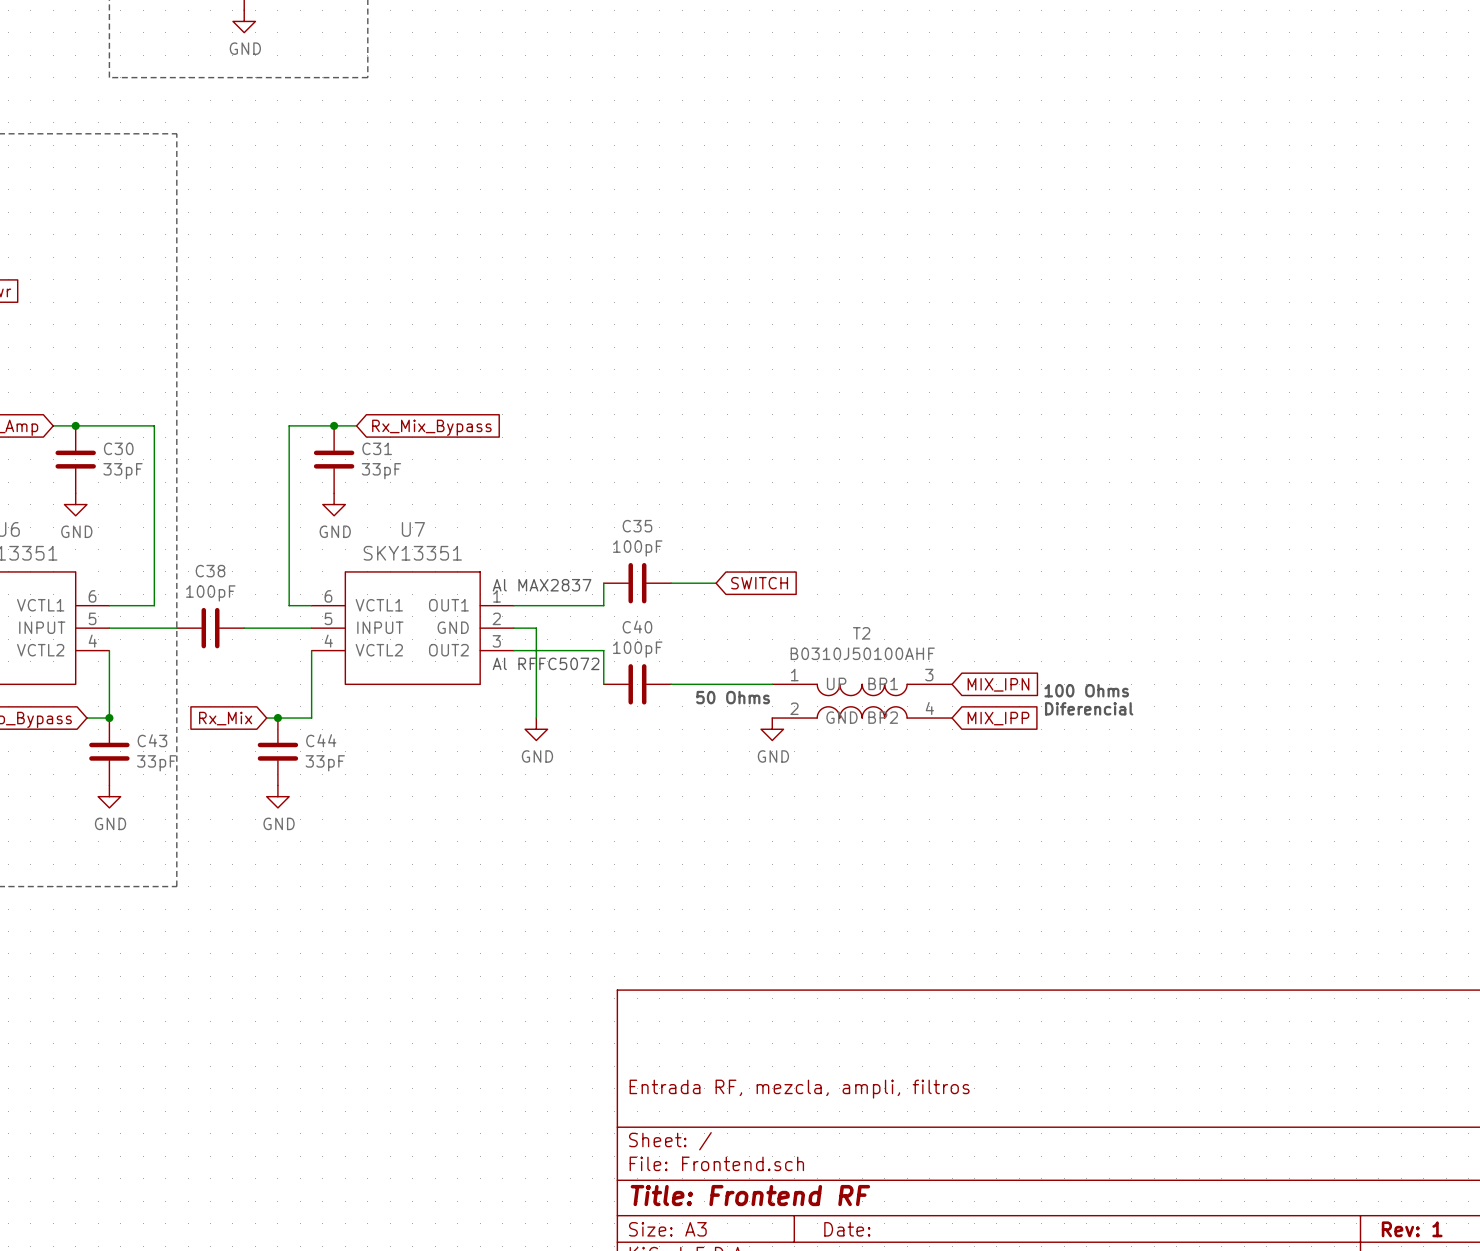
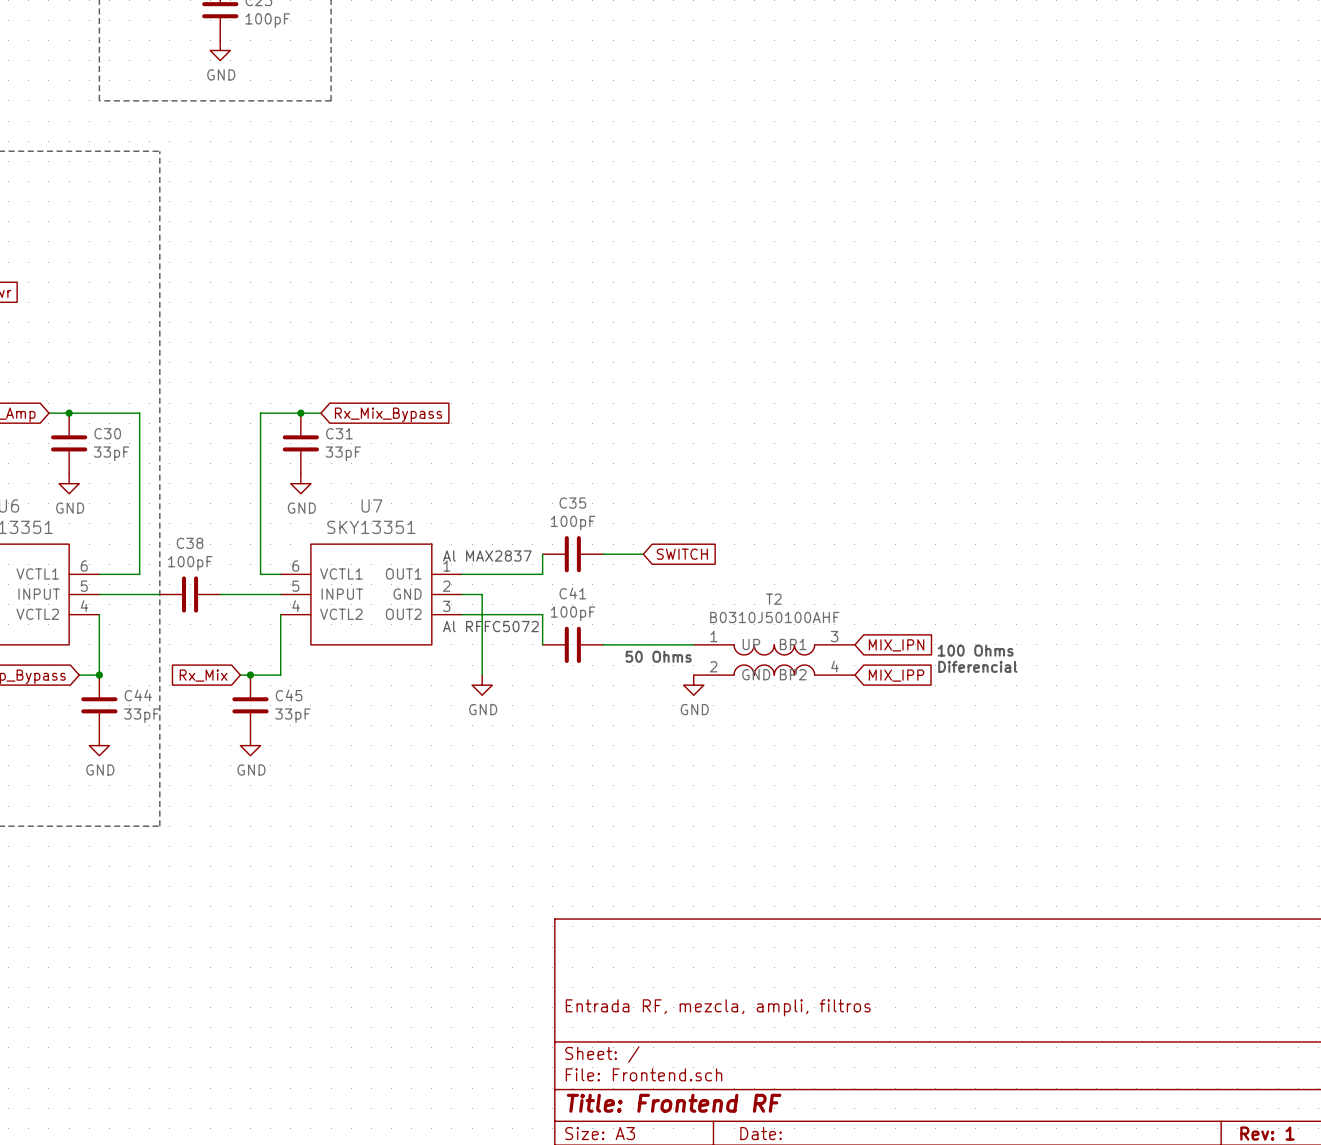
C40 name: C40 (637, 627) -> C41 (572, 593)
C43 name: C43 (152, 740) -> C44 (138, 695)
C44 name: C44 (321, 740) -> C45 (289, 695)

